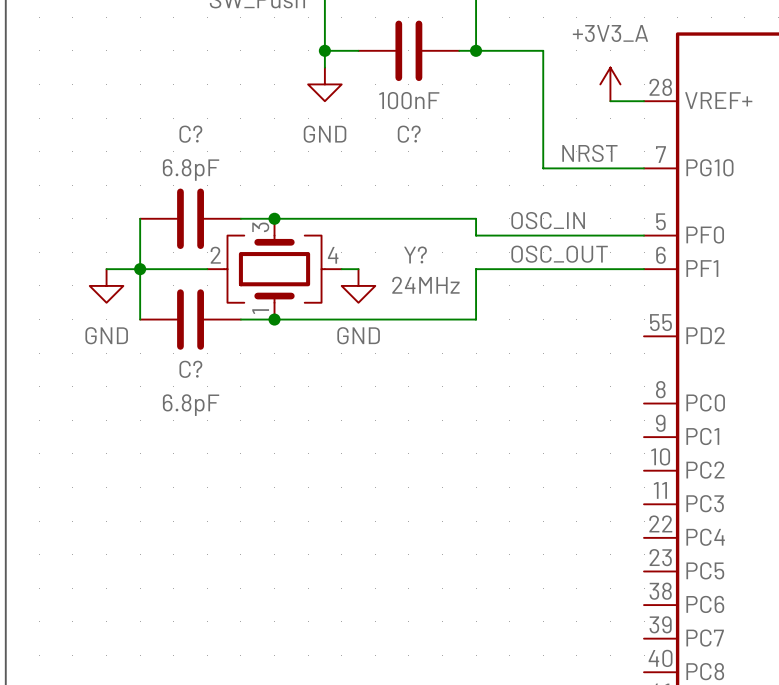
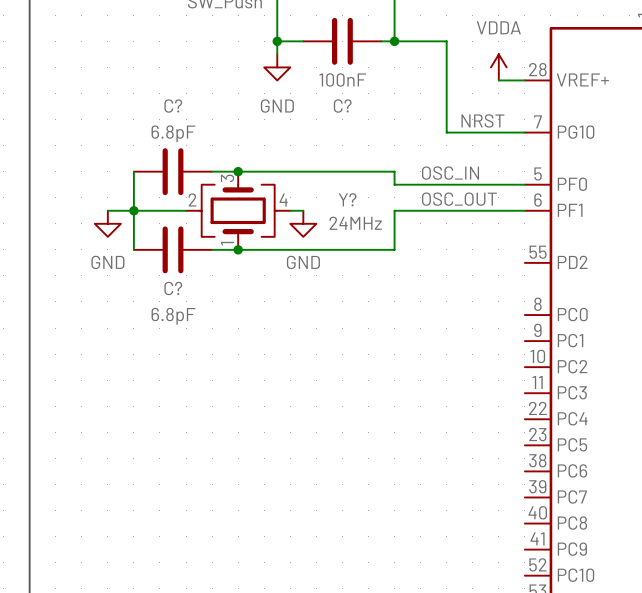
power symbol: +3V3_A (610, 84) -> VDDA (498, 67)

